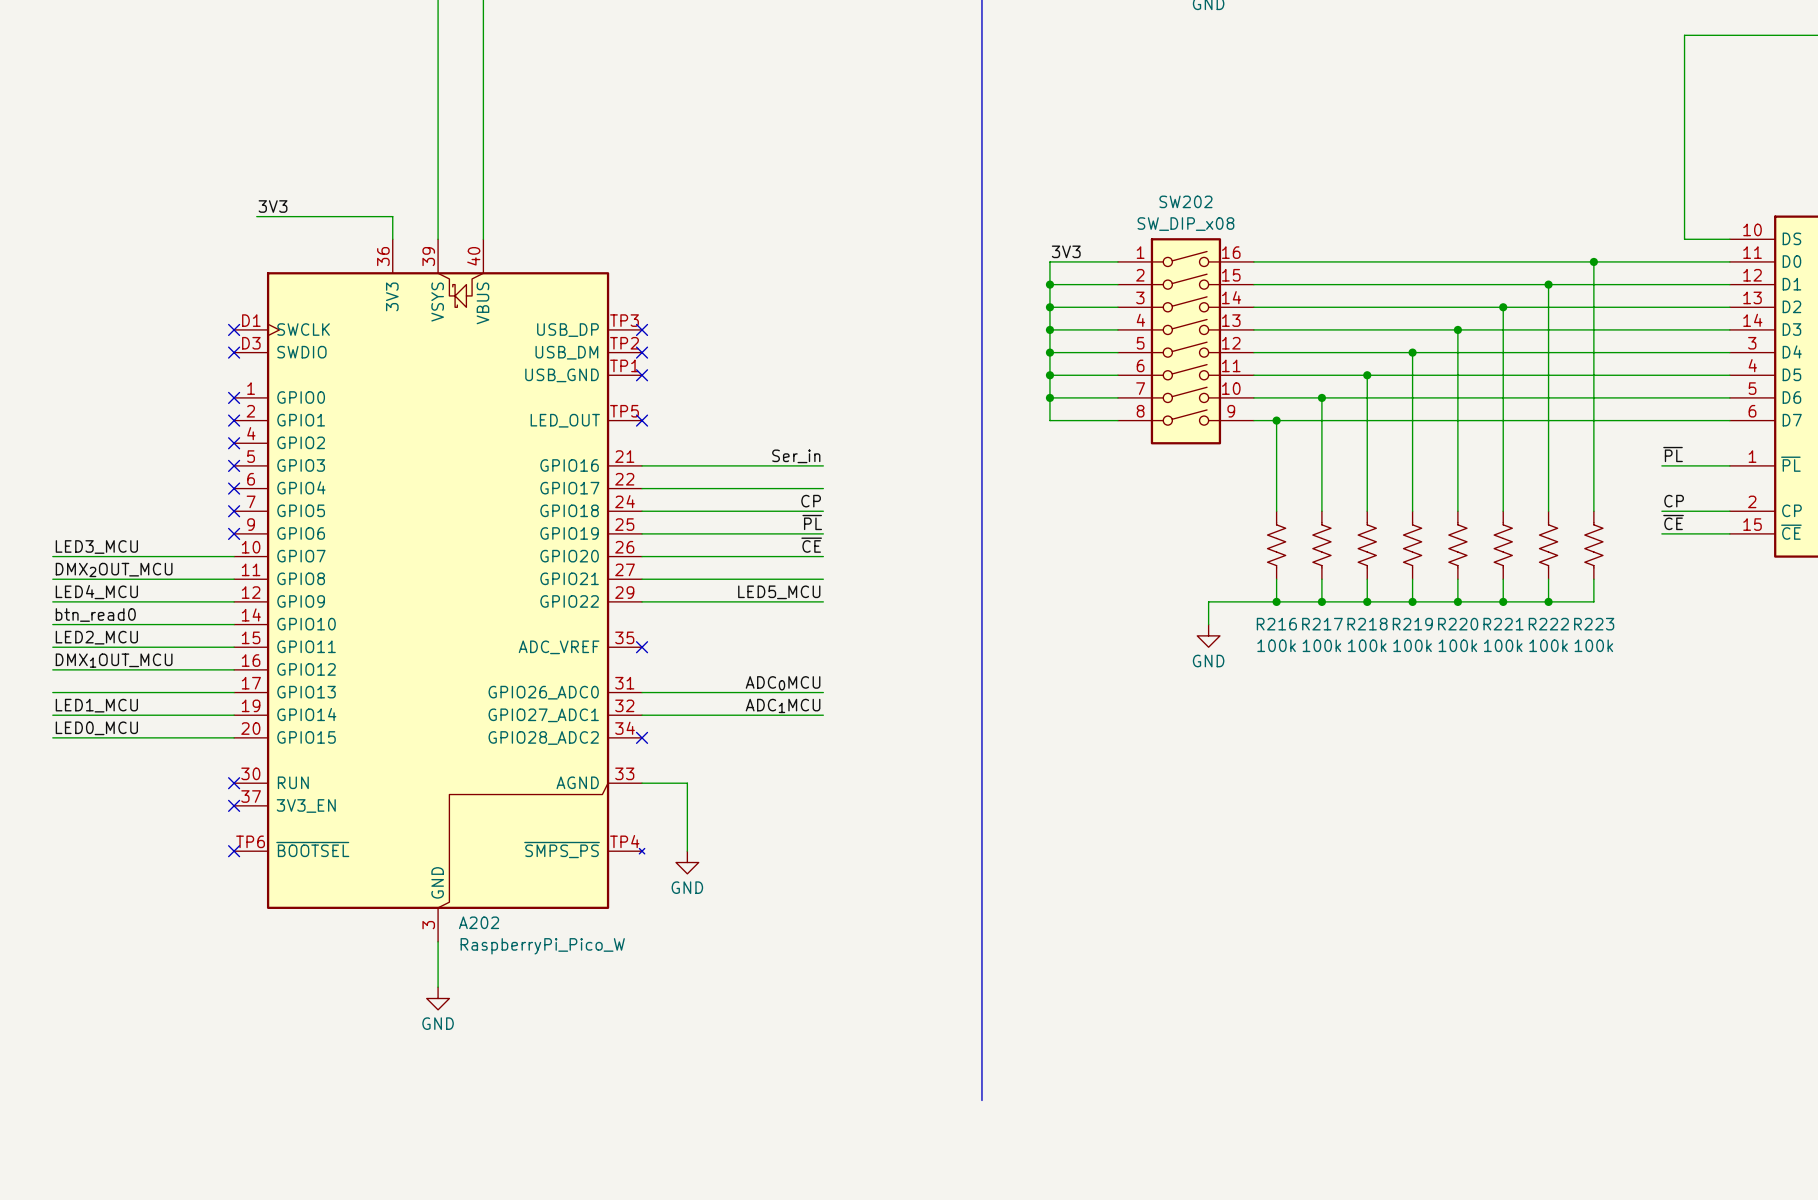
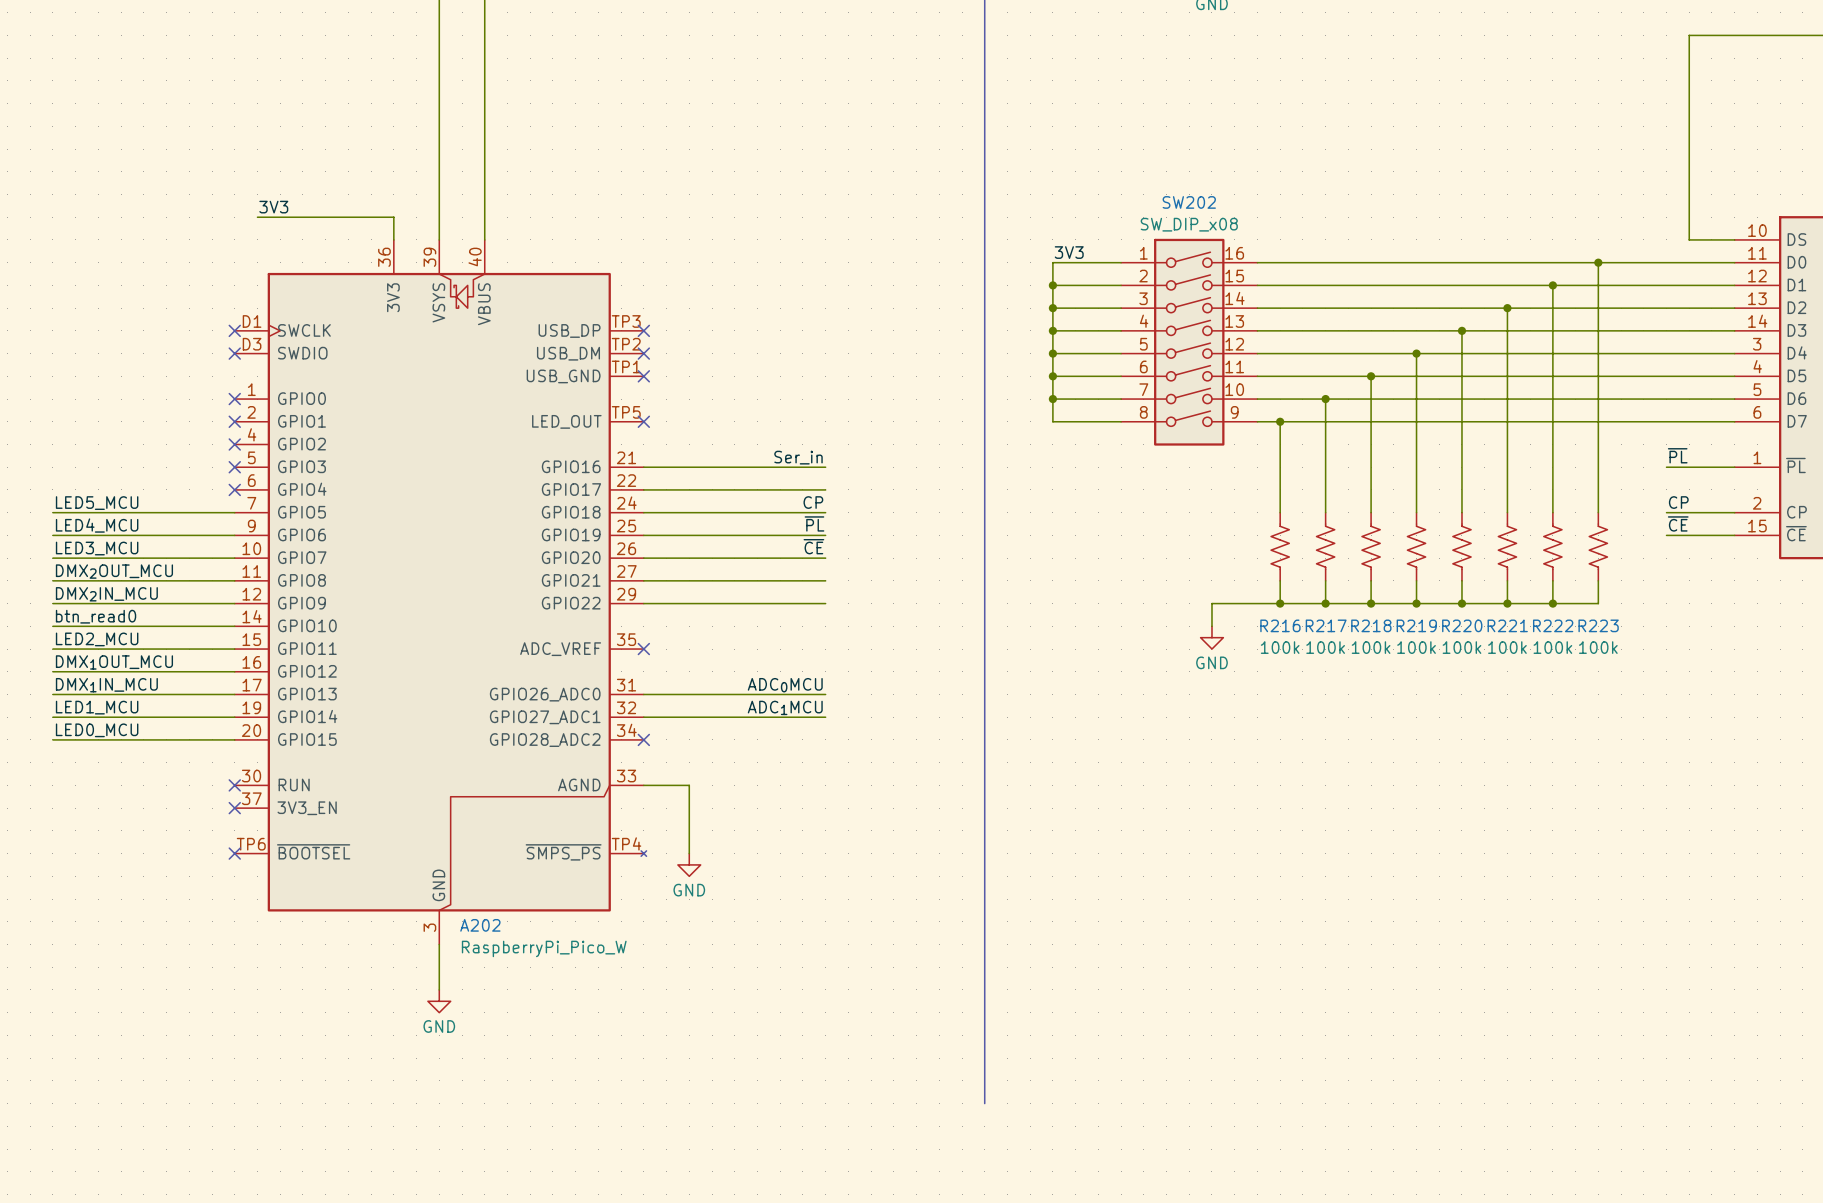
label: none -> LED5_MCU (97, 503)
wire: none -> (52, 512) (234, 512)
no-connect mark: (234, 511) -> none
label: none -> LED4_MCU (97, 525)
wire: none -> (52, 535) (234, 535)
no-connect mark: (234, 533) -> none
label: LED4_MCU (96, 592) -> DMX2IN_MCU (106, 594)
label: LED5_MCU (779, 592) -> none
label: none -> DMX1IN_MCU (106, 685)

